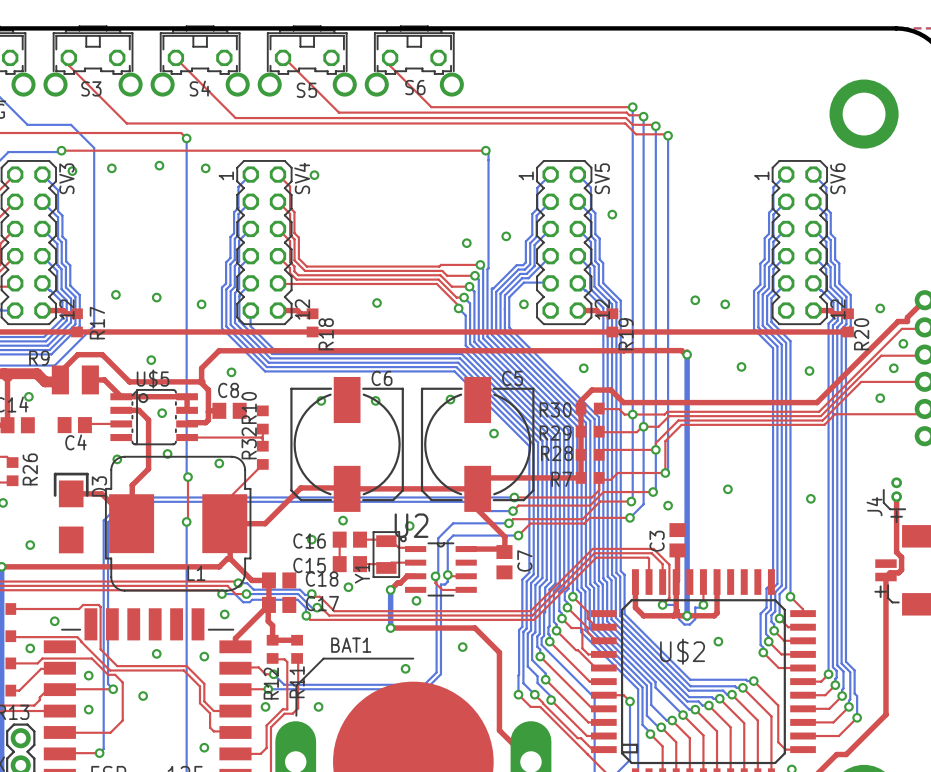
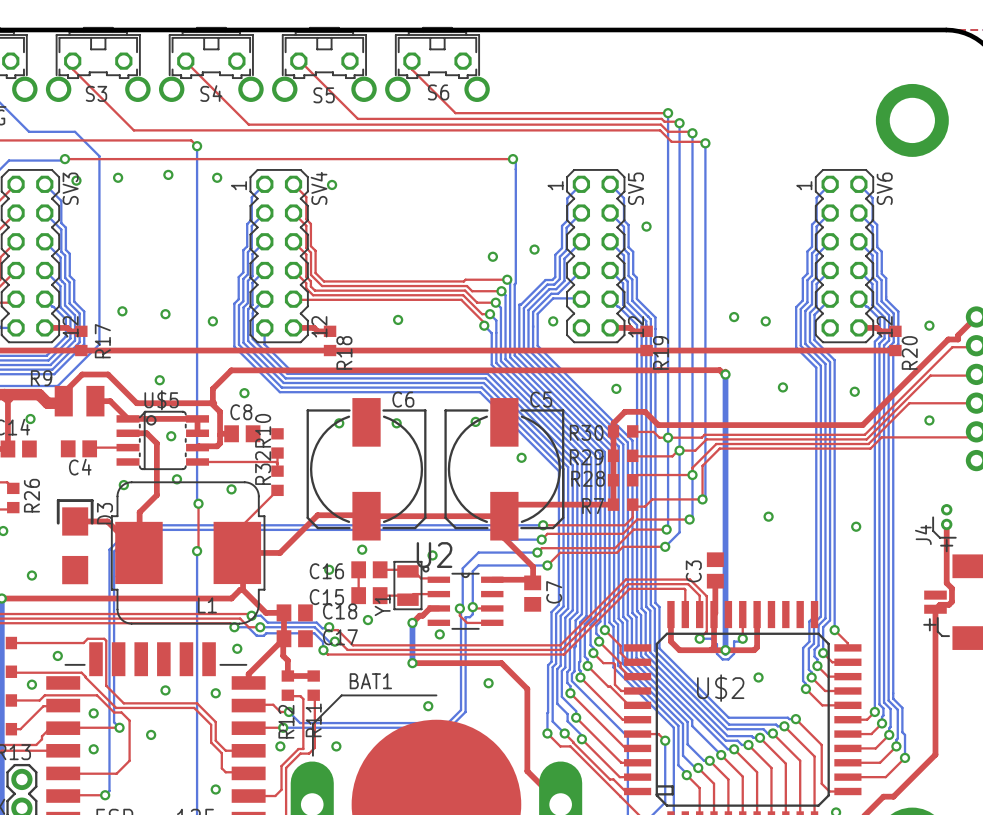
via: (903, 343) -> none
via: (893, 368) -> none
via: (668, 505) -> none

